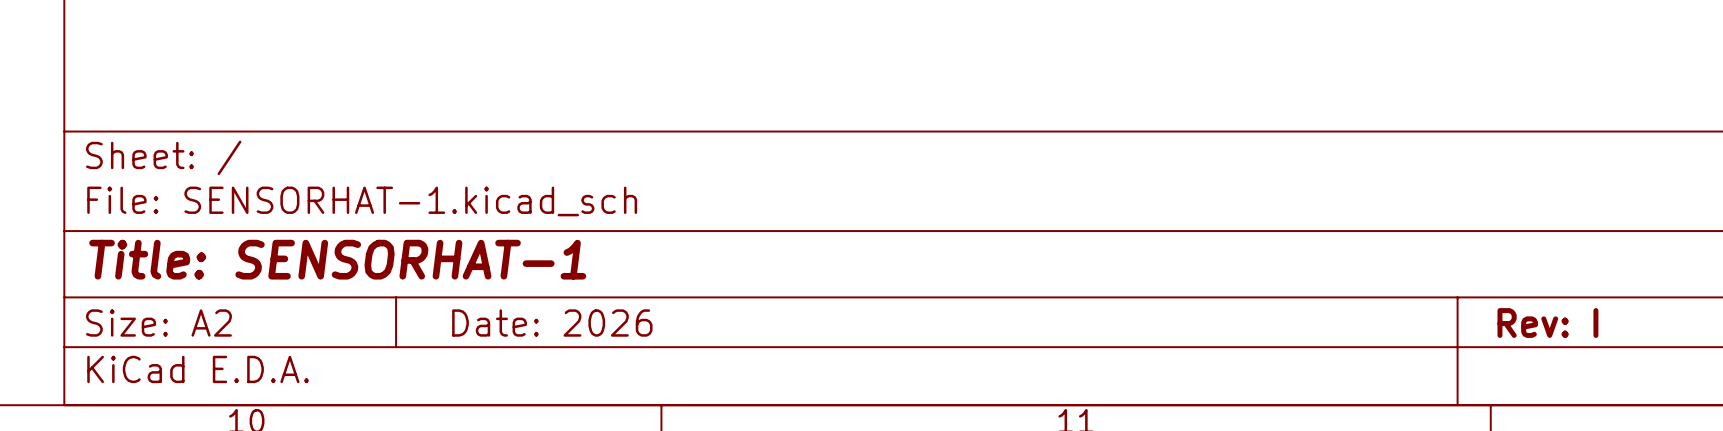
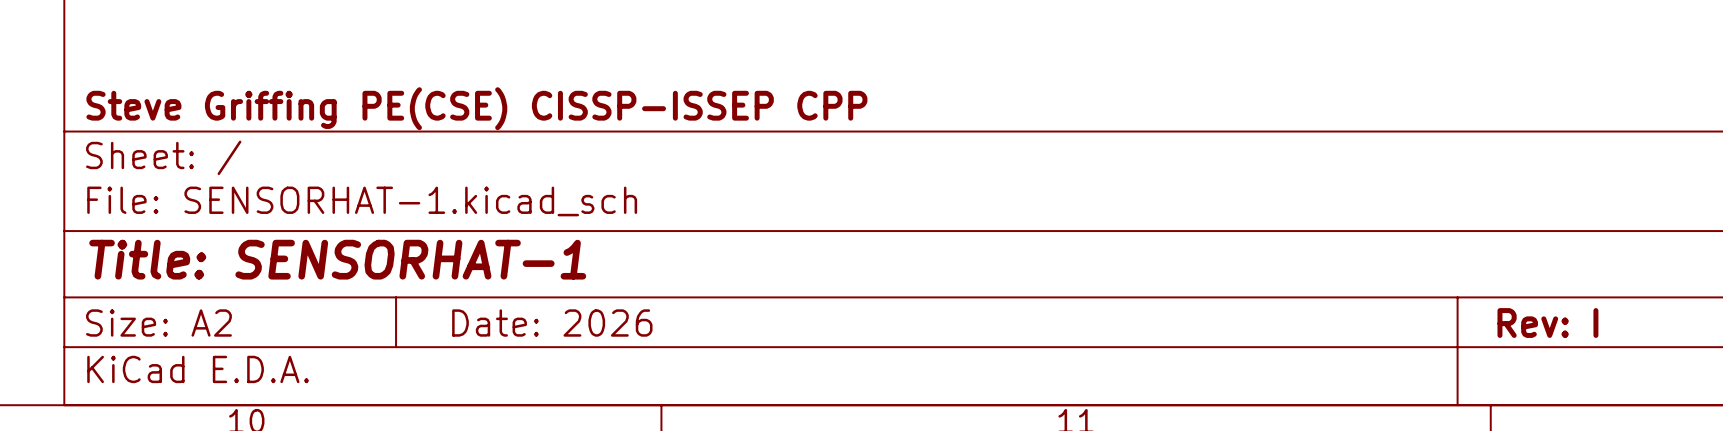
title block: none -> Steve Griffing PE(CSE) CISSP-ISSEP CPP (476, 108)

